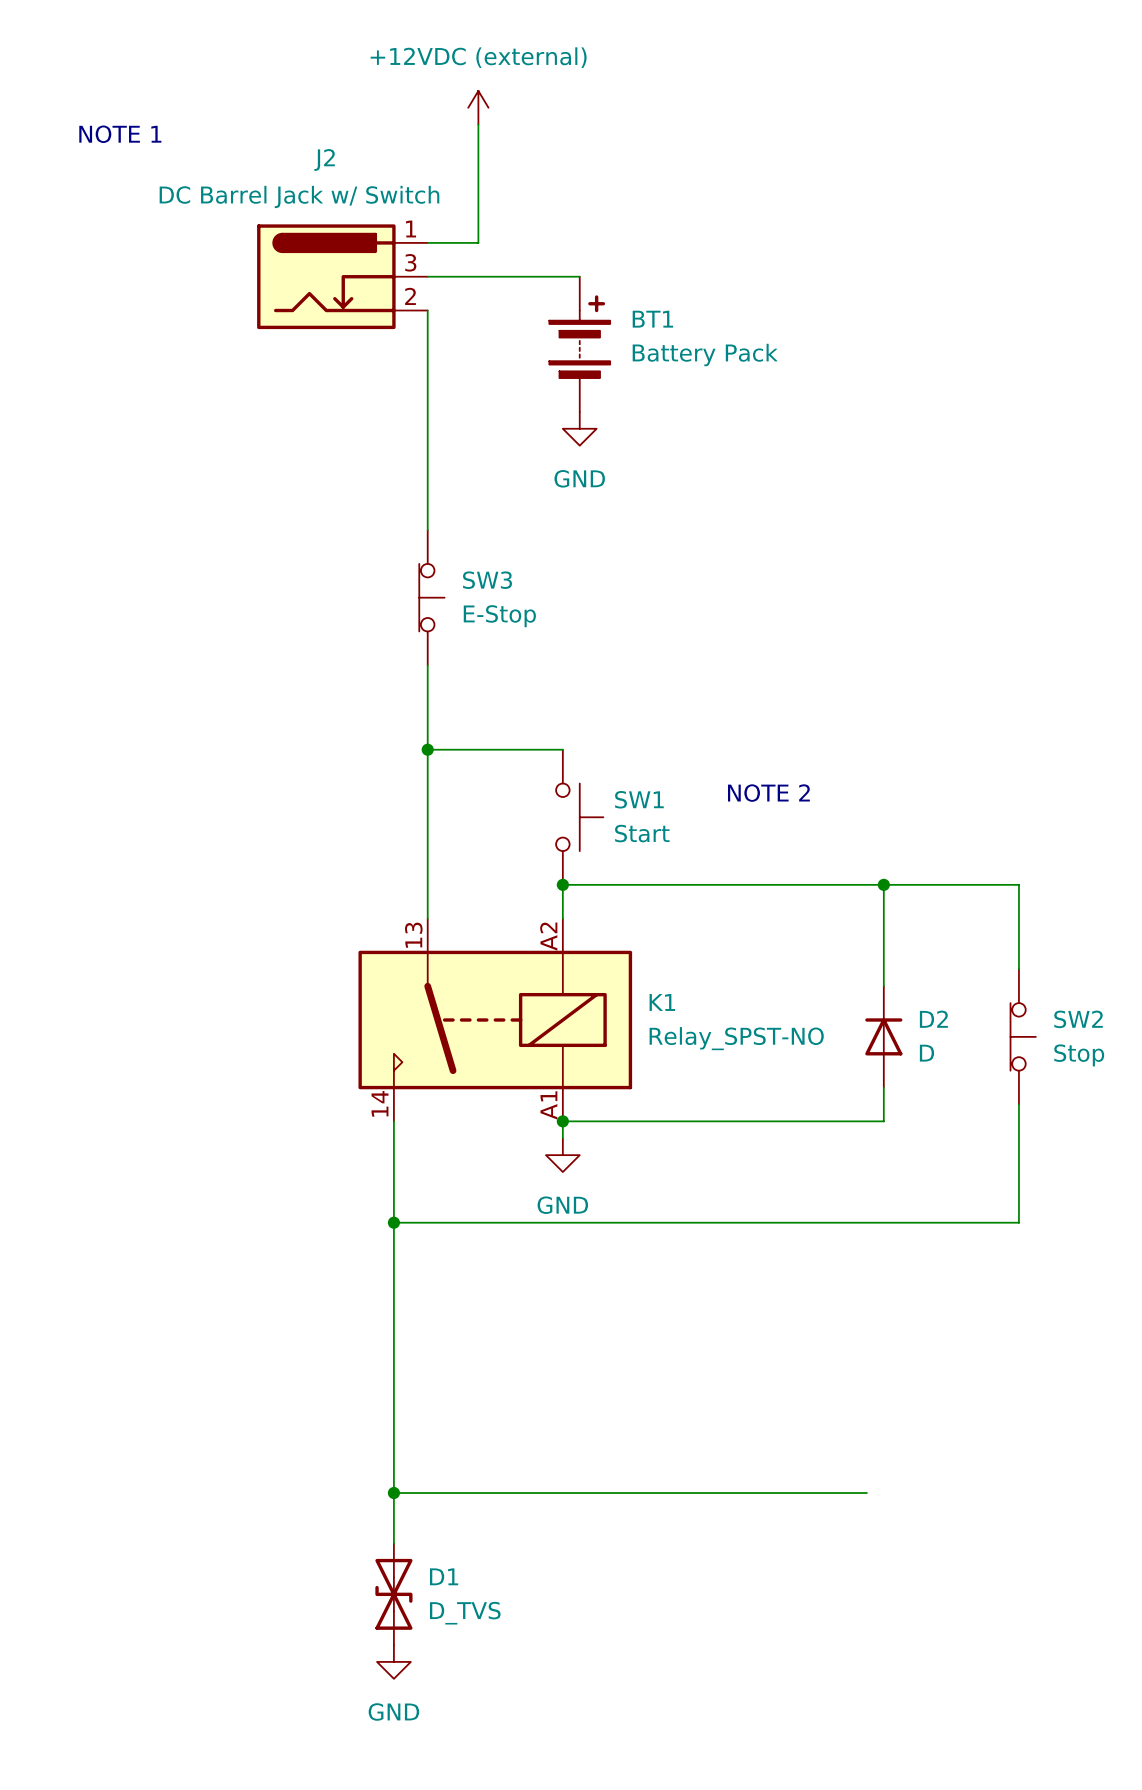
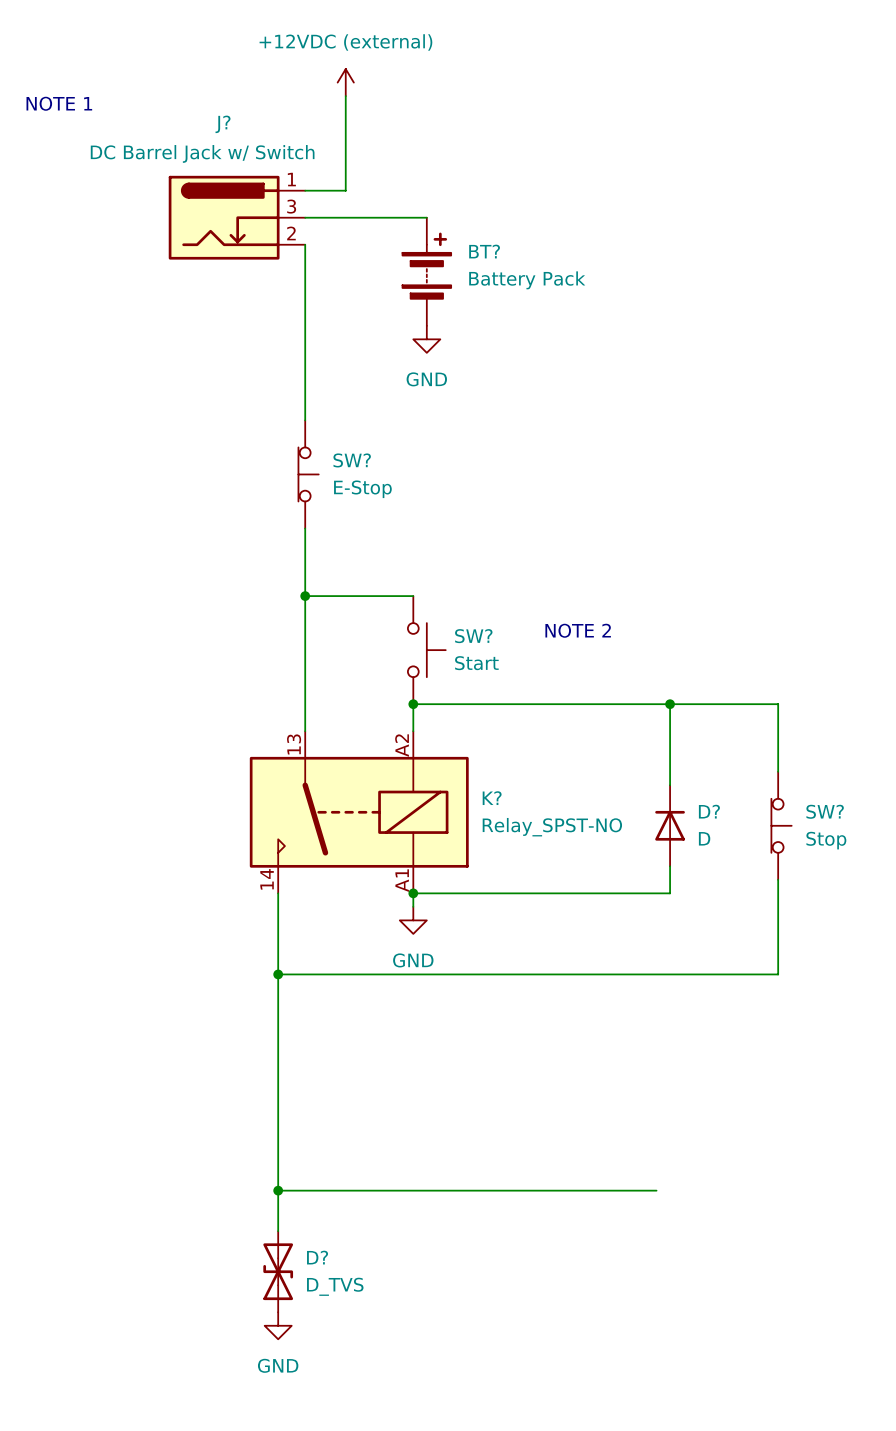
J2 name: J2 (324, 160) -> J? (223, 124)
BT1 name: BT1 (652, 319) -> BT? (484, 251)
SW3 name: SW3 (487, 580) -> SW? (352, 460)
SW1 name: SW1 (639, 799) -> SW? (473, 636)
K1 name: K1 (662, 1002) -> K? (492, 798)
D2 name: D2 (933, 1019) -> D? (709, 811)
SW2 name: SW2 (1078, 1019) -> SW? (825, 811)
D1 name: D1 (444, 1576) -> D? (317, 1257)

